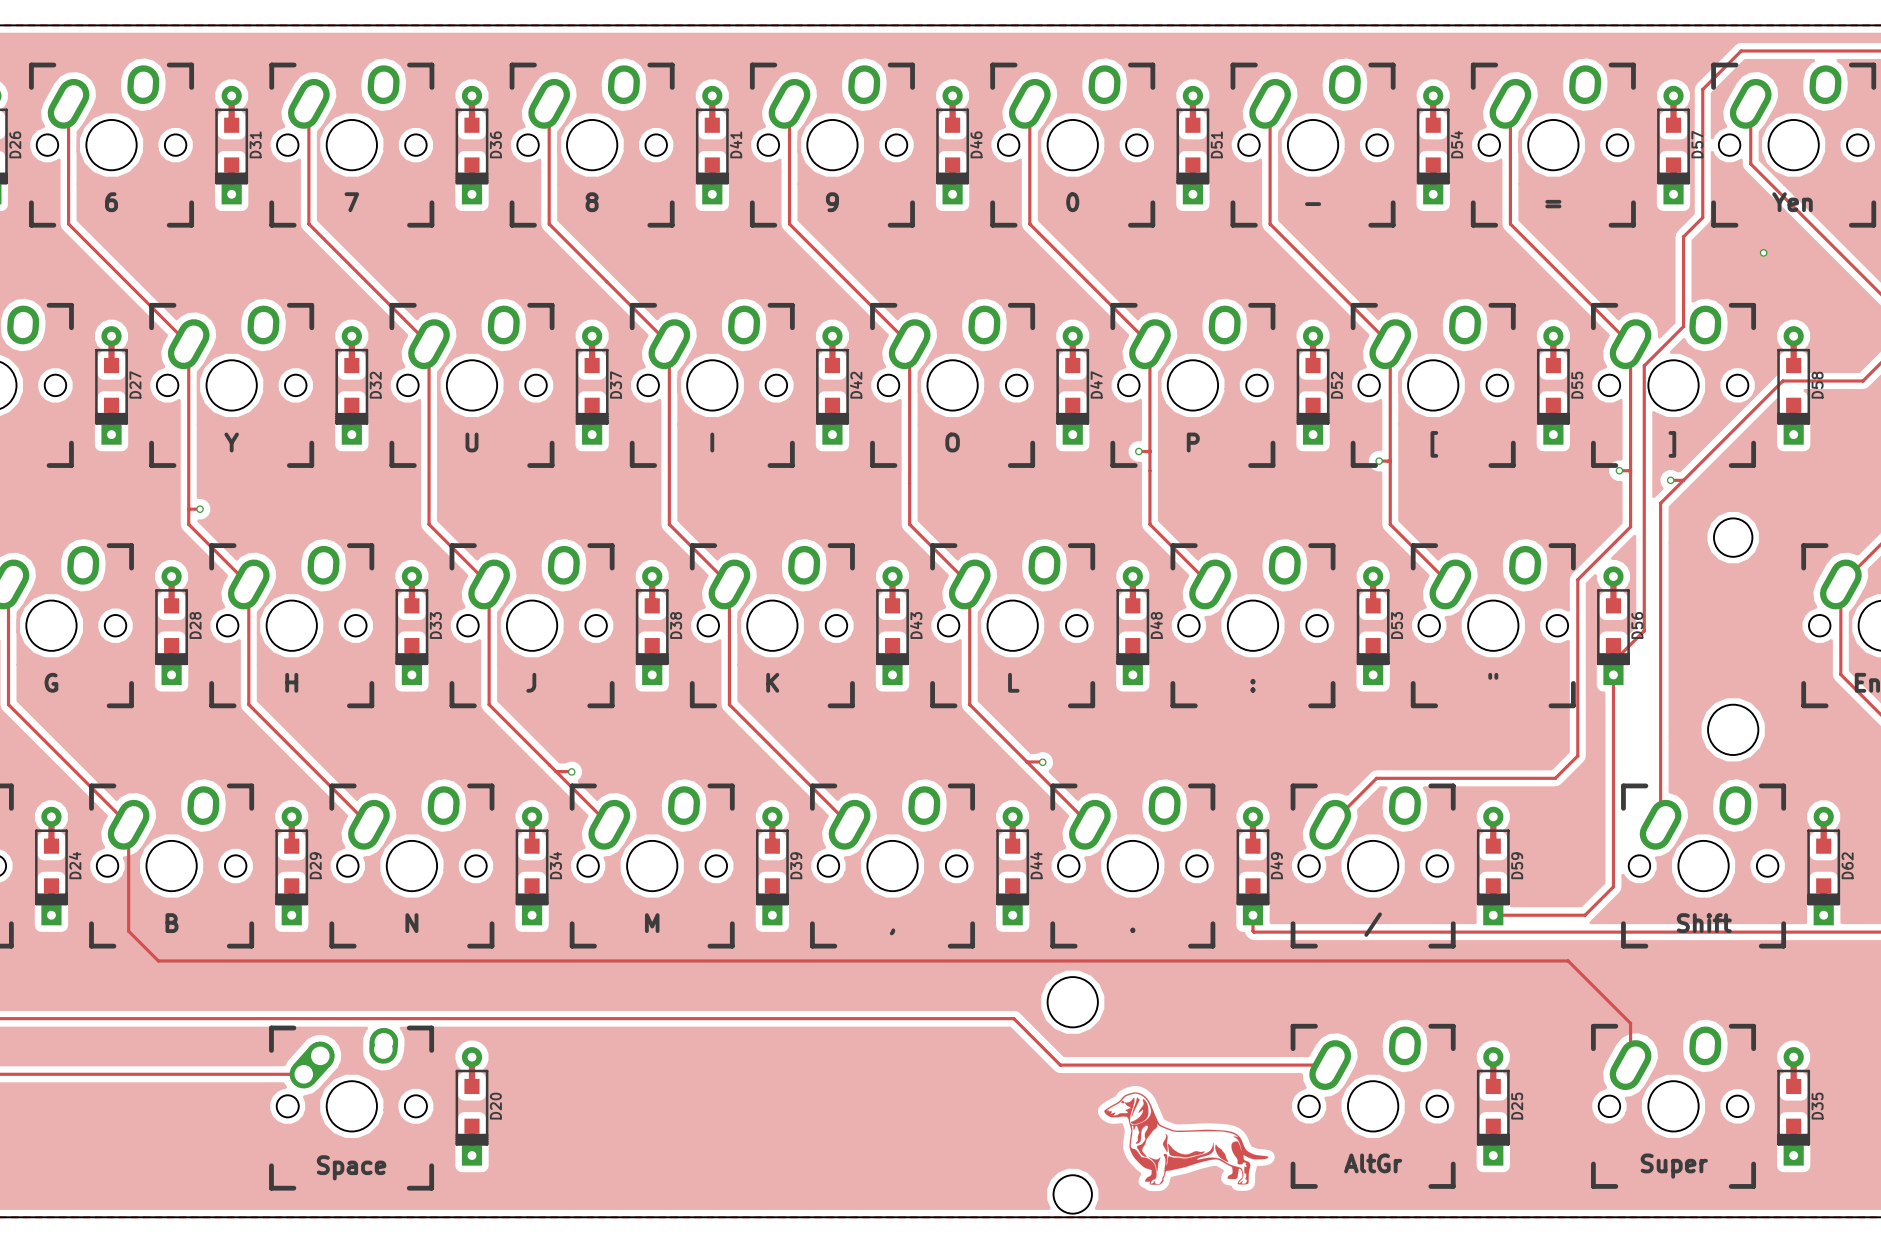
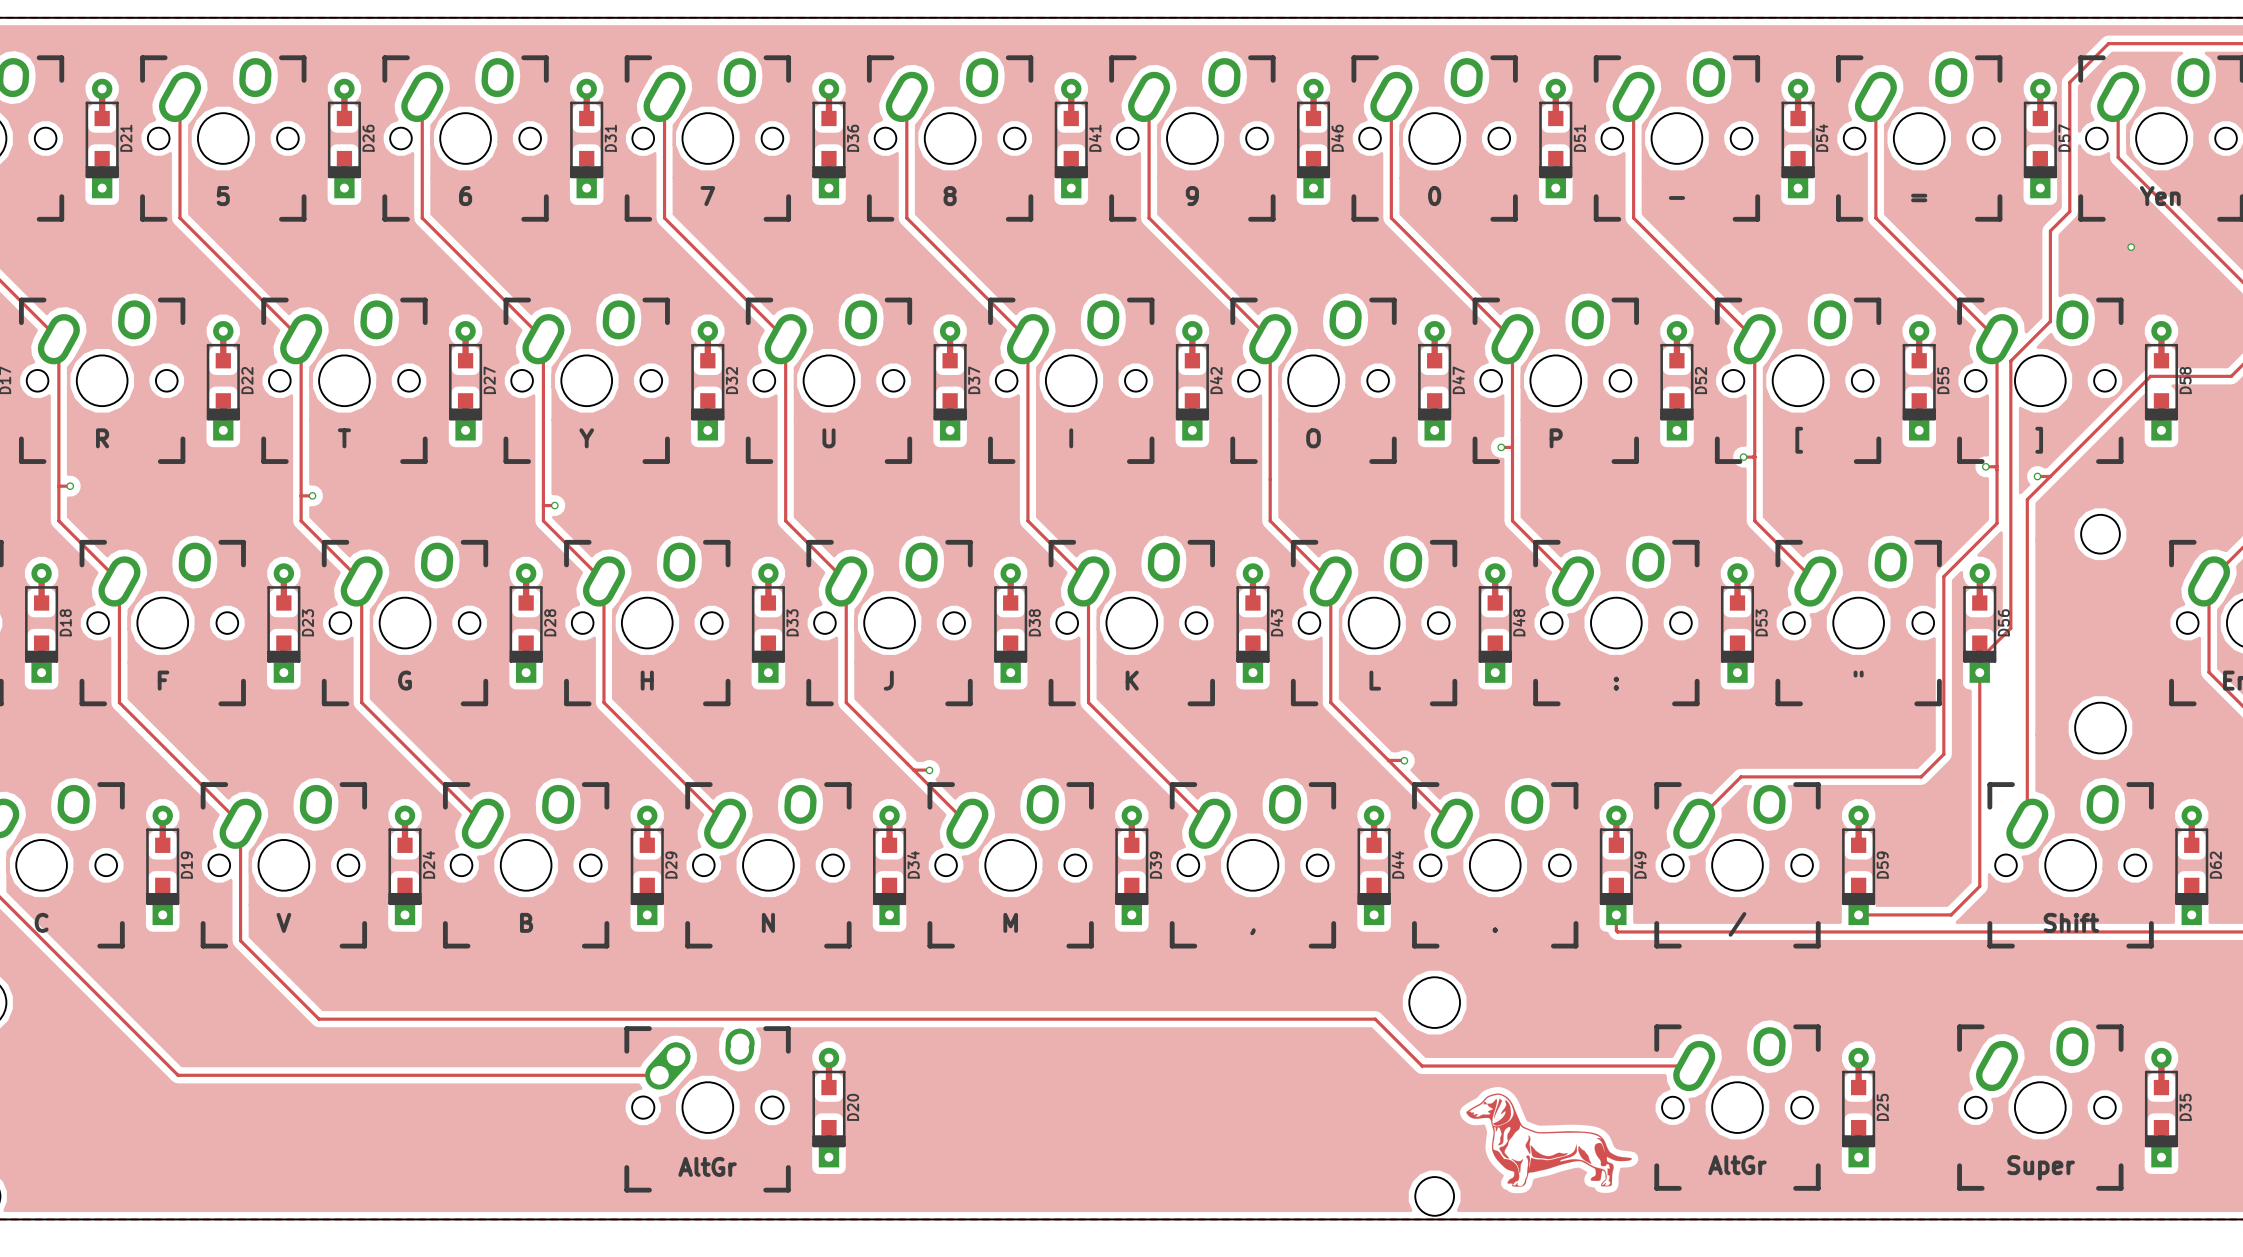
track: (128, 824) (128, 931) (158, 960) (1568, 960) (1630, 1023) (1630, 1045) -> none
drawing shape: [269, 1025, 435, 1191] -> [624, 1026, 791, 1193]

